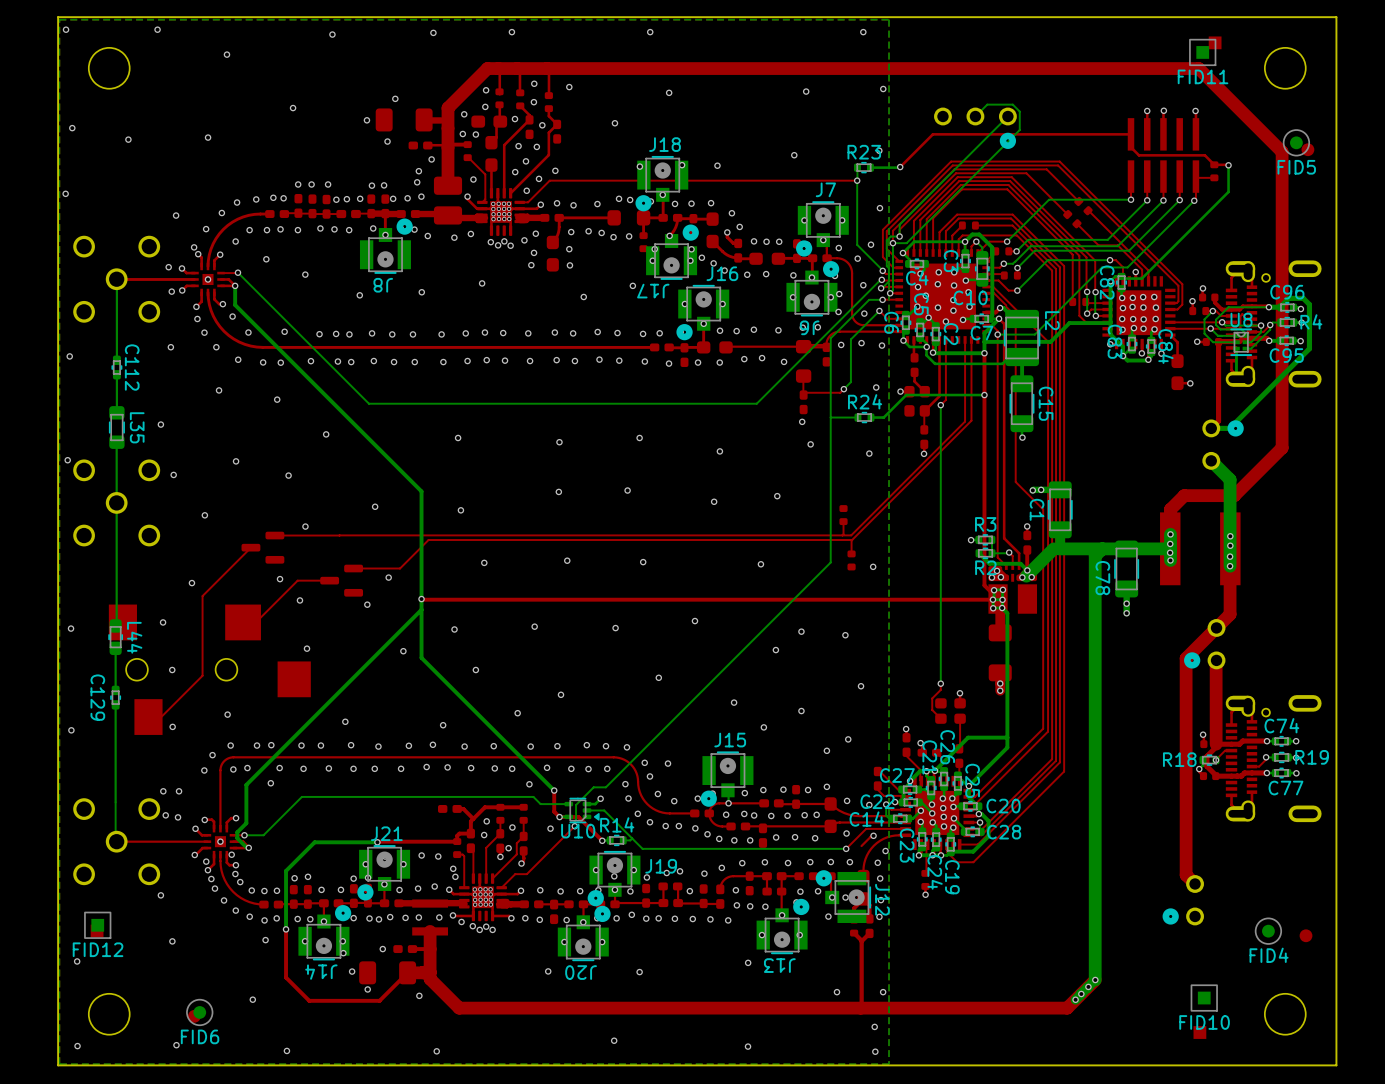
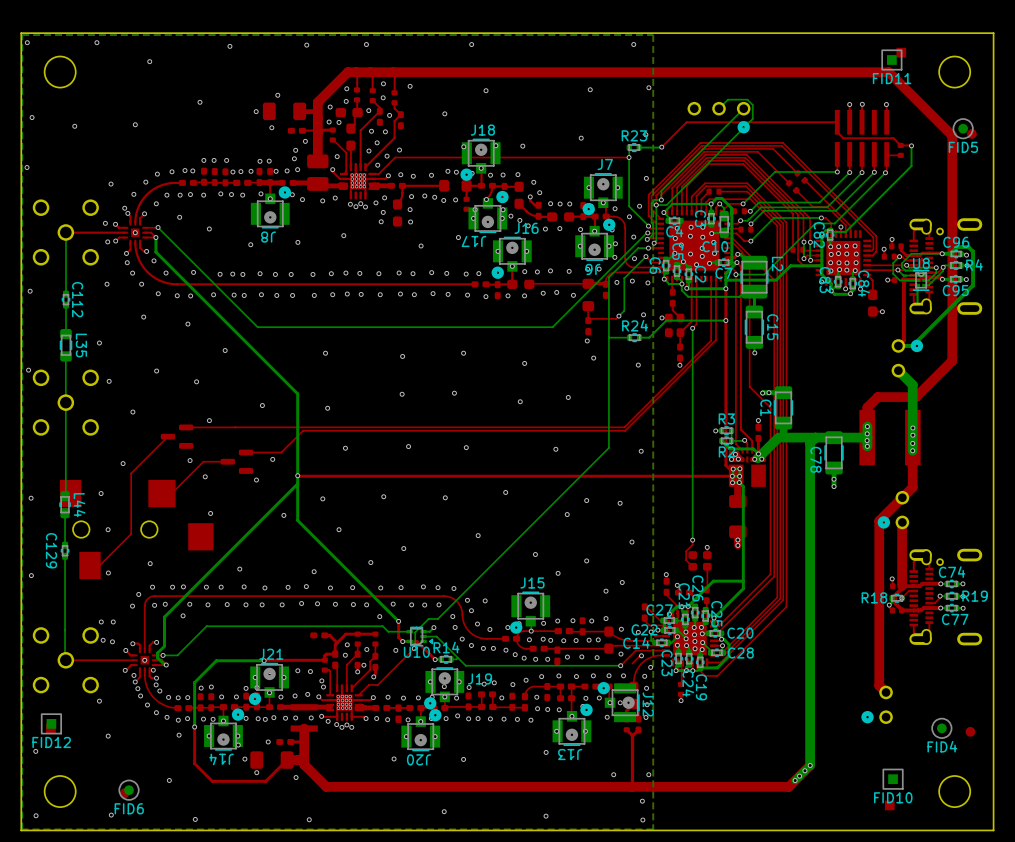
part: (843, 515) -> none
top track: (843, 521) (842, 535) -> none
top track: (852, 540) (851, 553) -> none
part: (851, 560) -> none

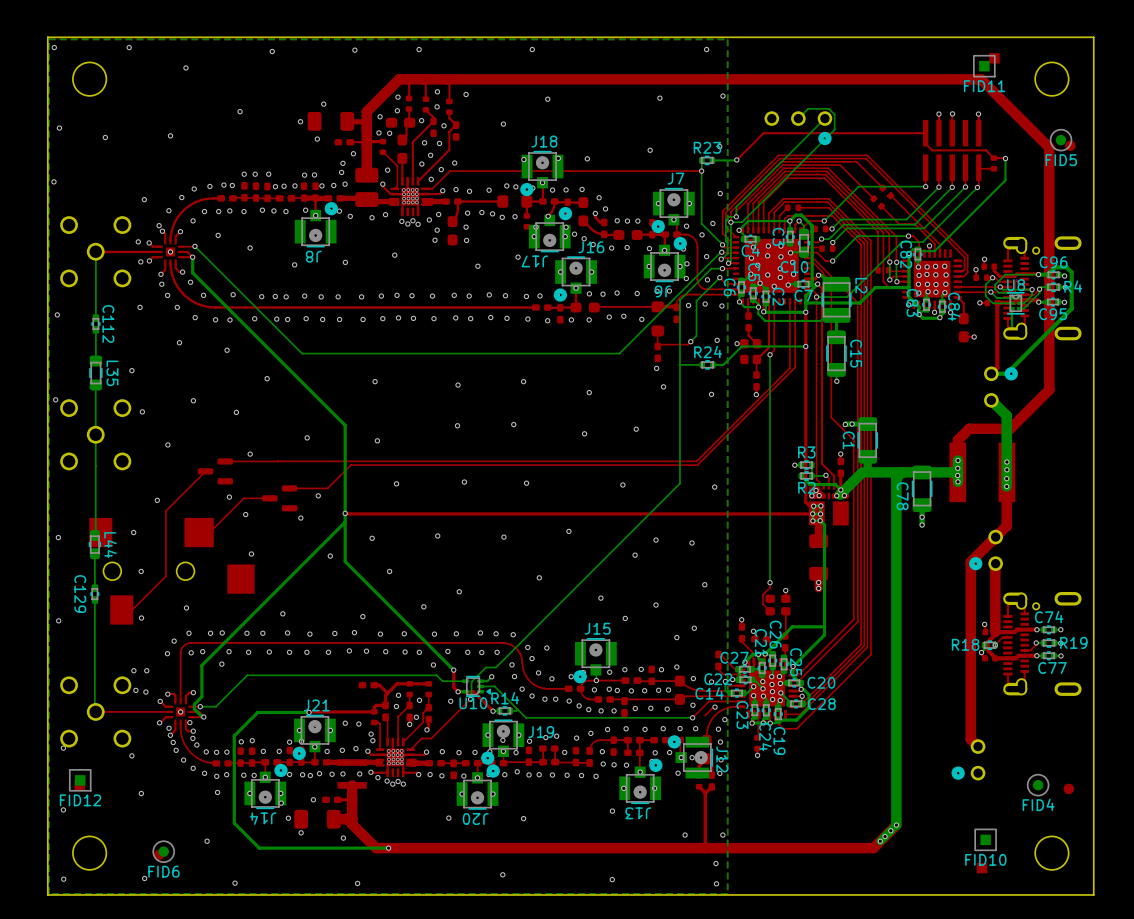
via: none -> (63, 748)
top track: (194, 726) (194, 763) (212, 781) (265, 781) (287, 760) -> none
bottom track: none -> (234, 783) (234, 823) (259, 848) (388, 848)
via: (194, 726) -> none
via: none -> (388, 848)

